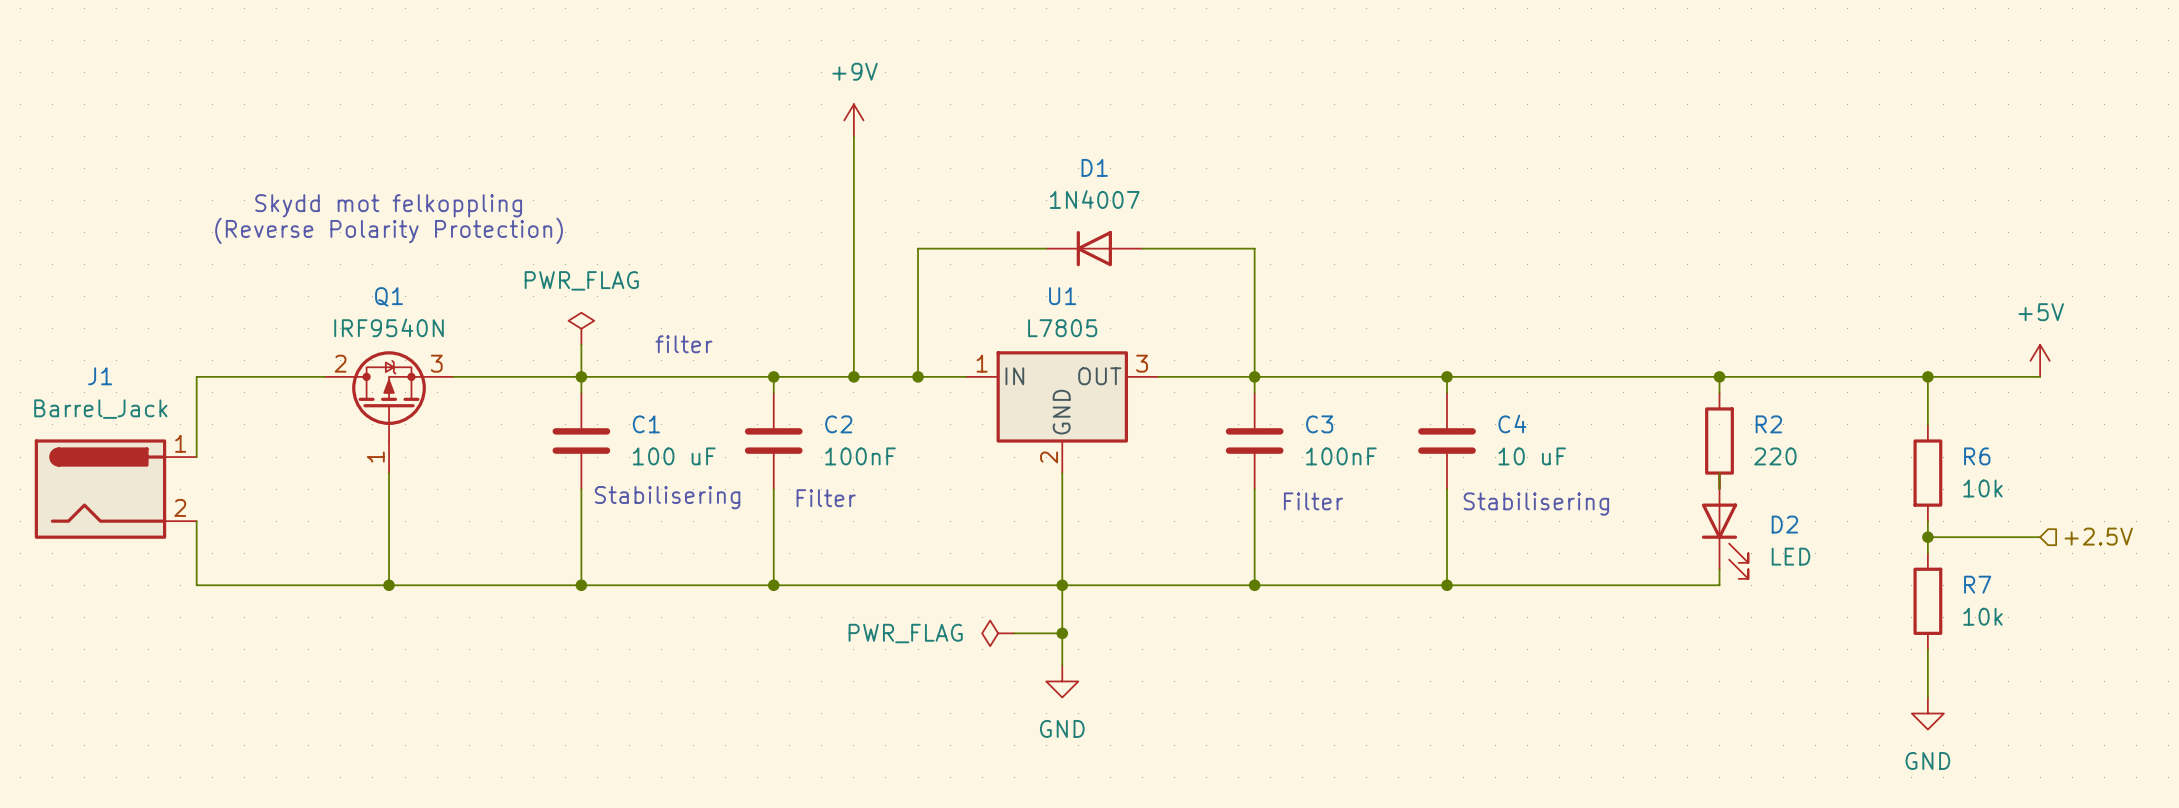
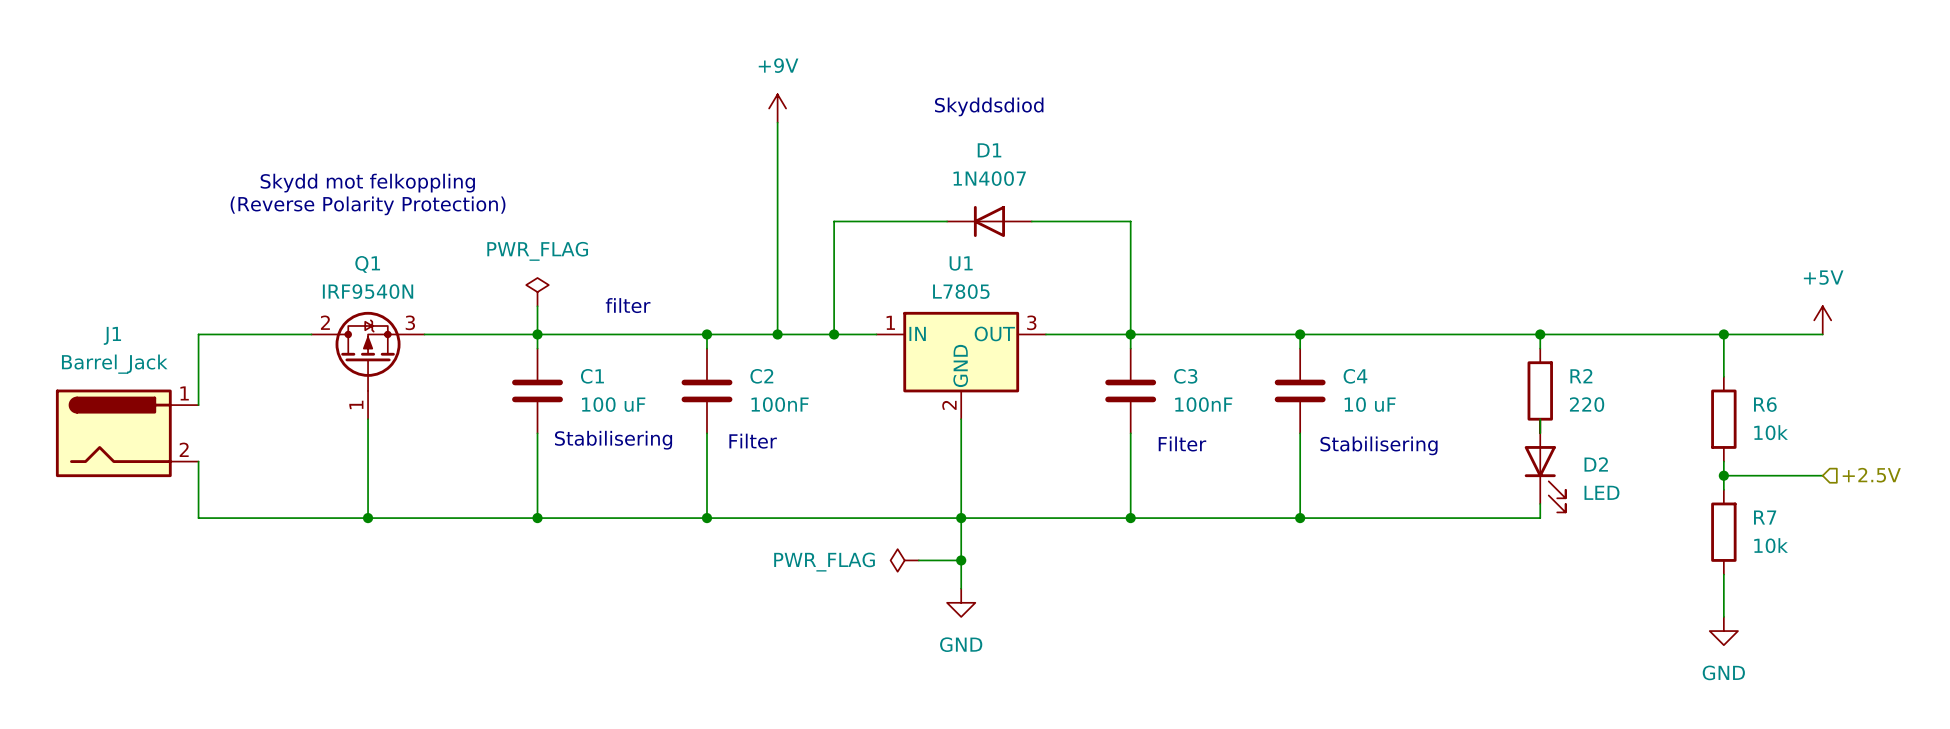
text: none -> Skyddsdiod (989, 106)

